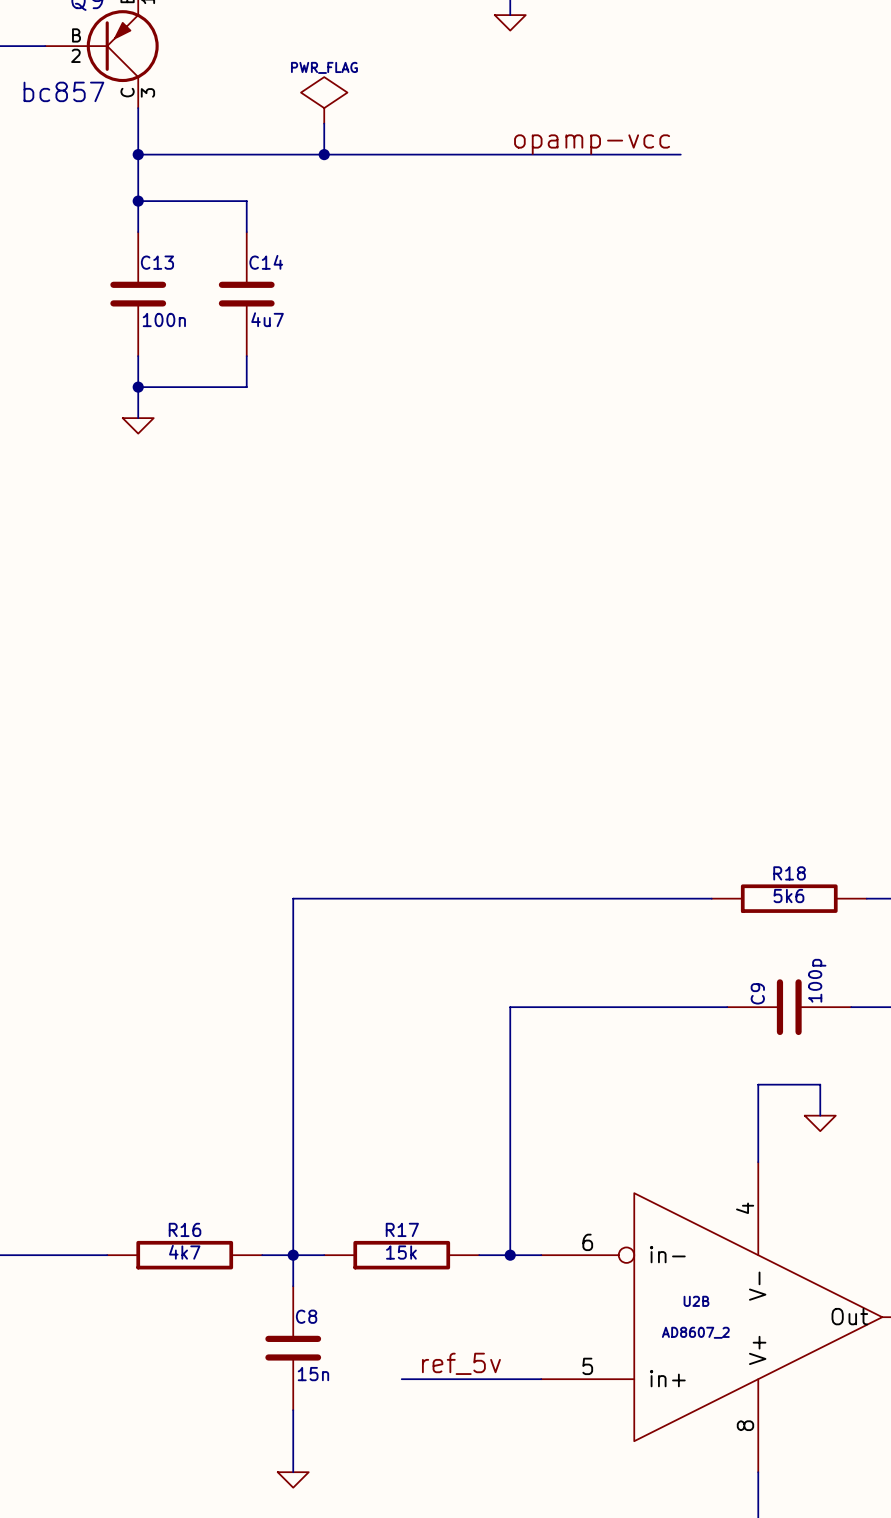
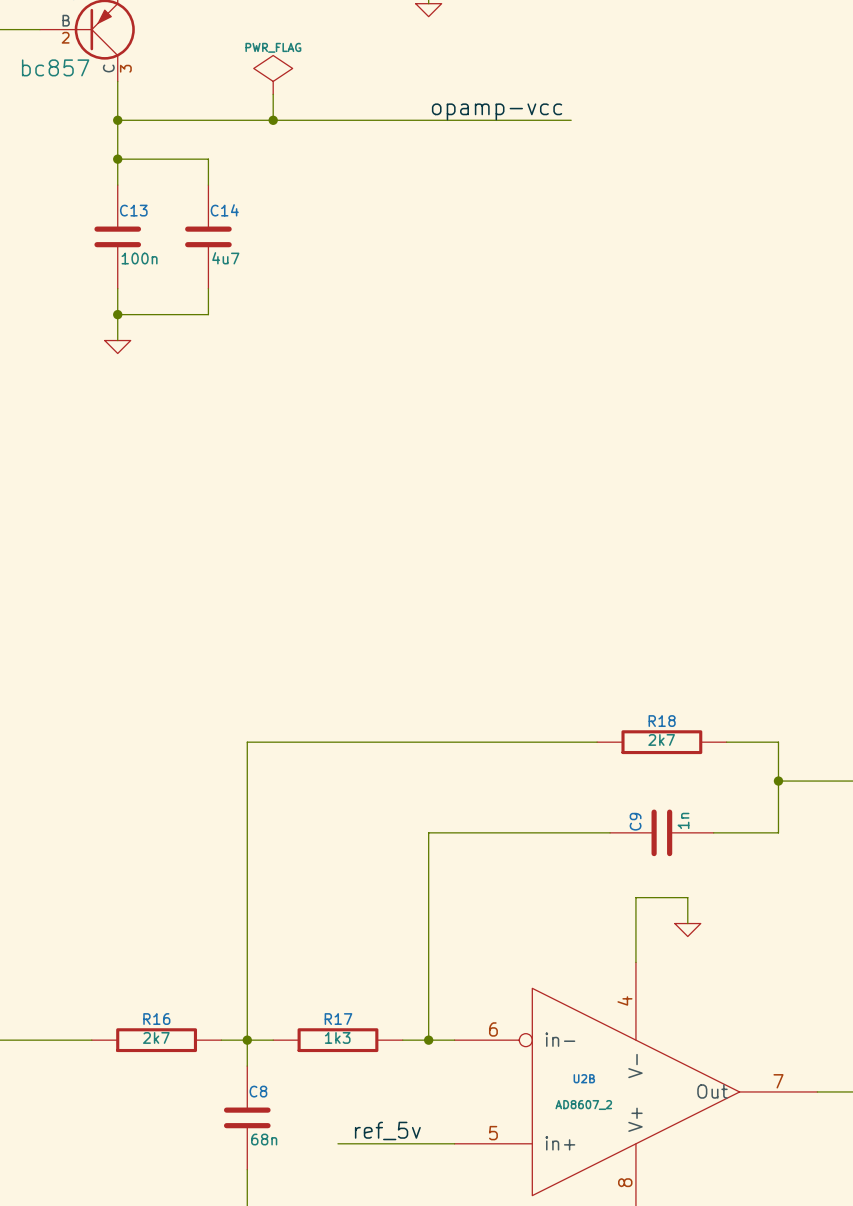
R18 value: 5k6 (788, 896) -> 2k7 (661, 739)
C9 value: 100p (817, 980) -> 1n (683, 820)
R16 value: 4k7 (184, 1252) -> 2k7 (156, 1037)
R17 value: 15k (401, 1252) -> 1k3 (337, 1037)
C8 value: 15n (313, 1374) -> 68n (264, 1139)

